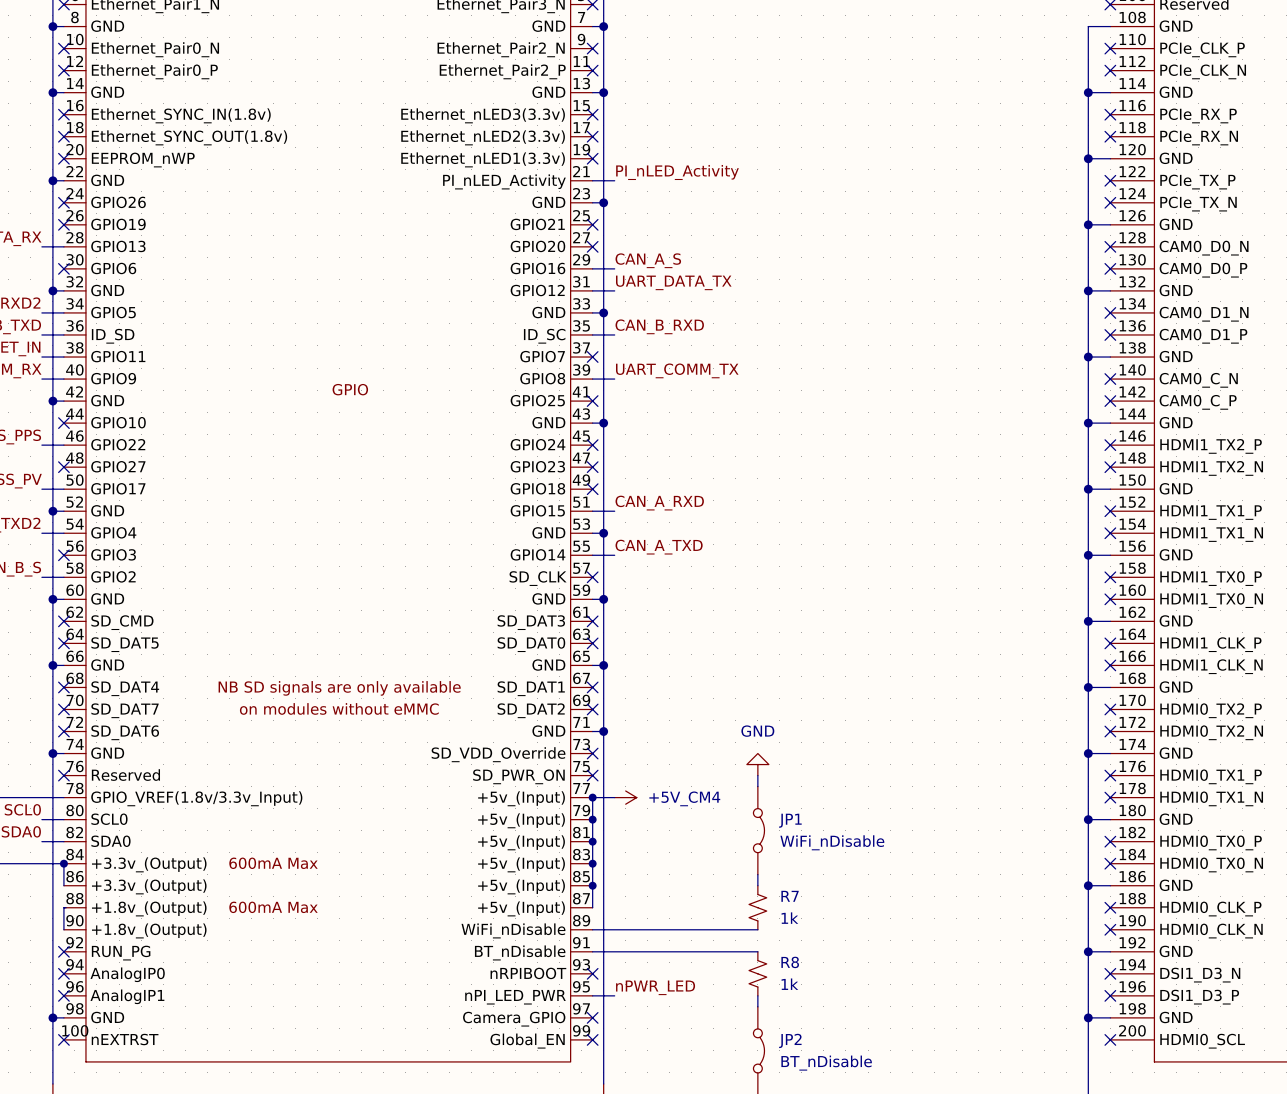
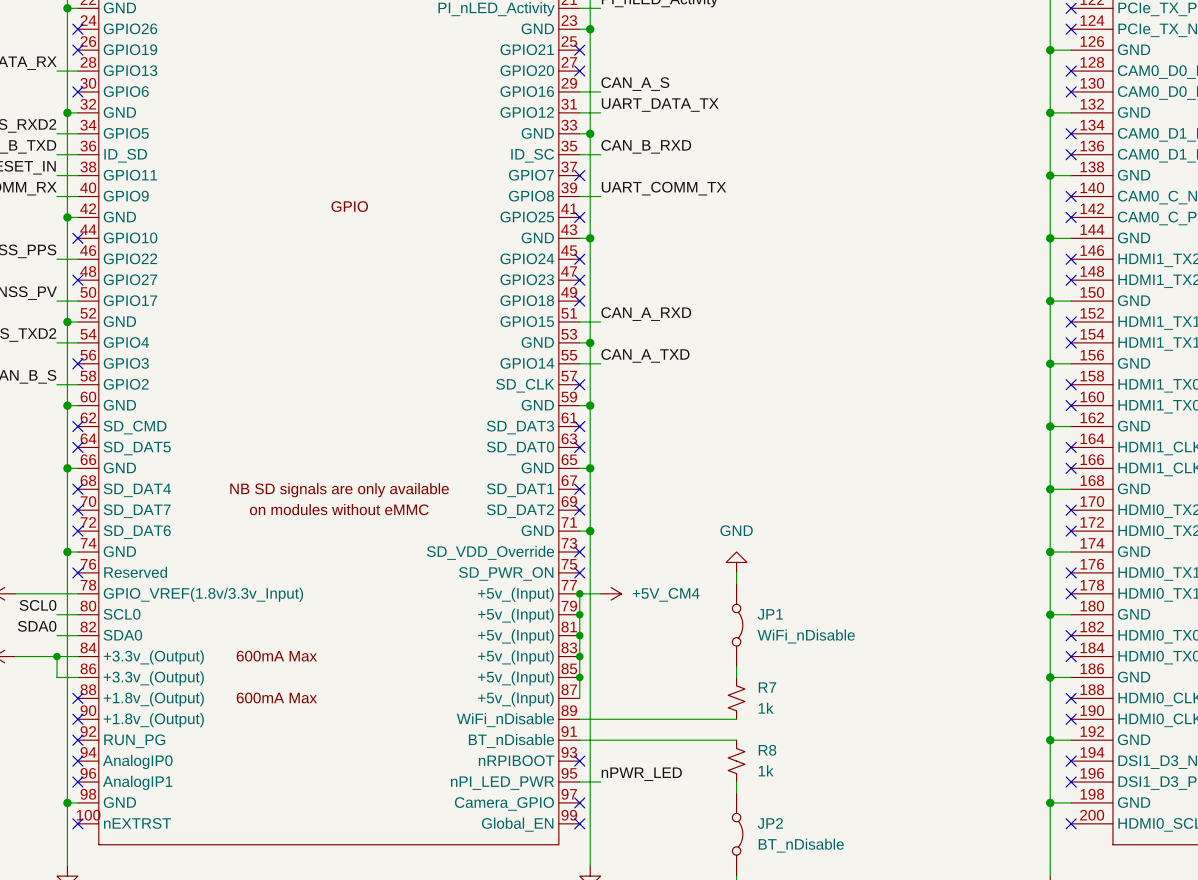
wire: (63, 863) (63, 885) -> (56, 656) (56, 677) (77, 677)
junction position: (63, 863) -> (56, 656)
no-connect mark: none -> (77, 698)
wire: (66, 907) (63, 907) (63, 929) -> none
no-connect mark: none -> (77, 719)

